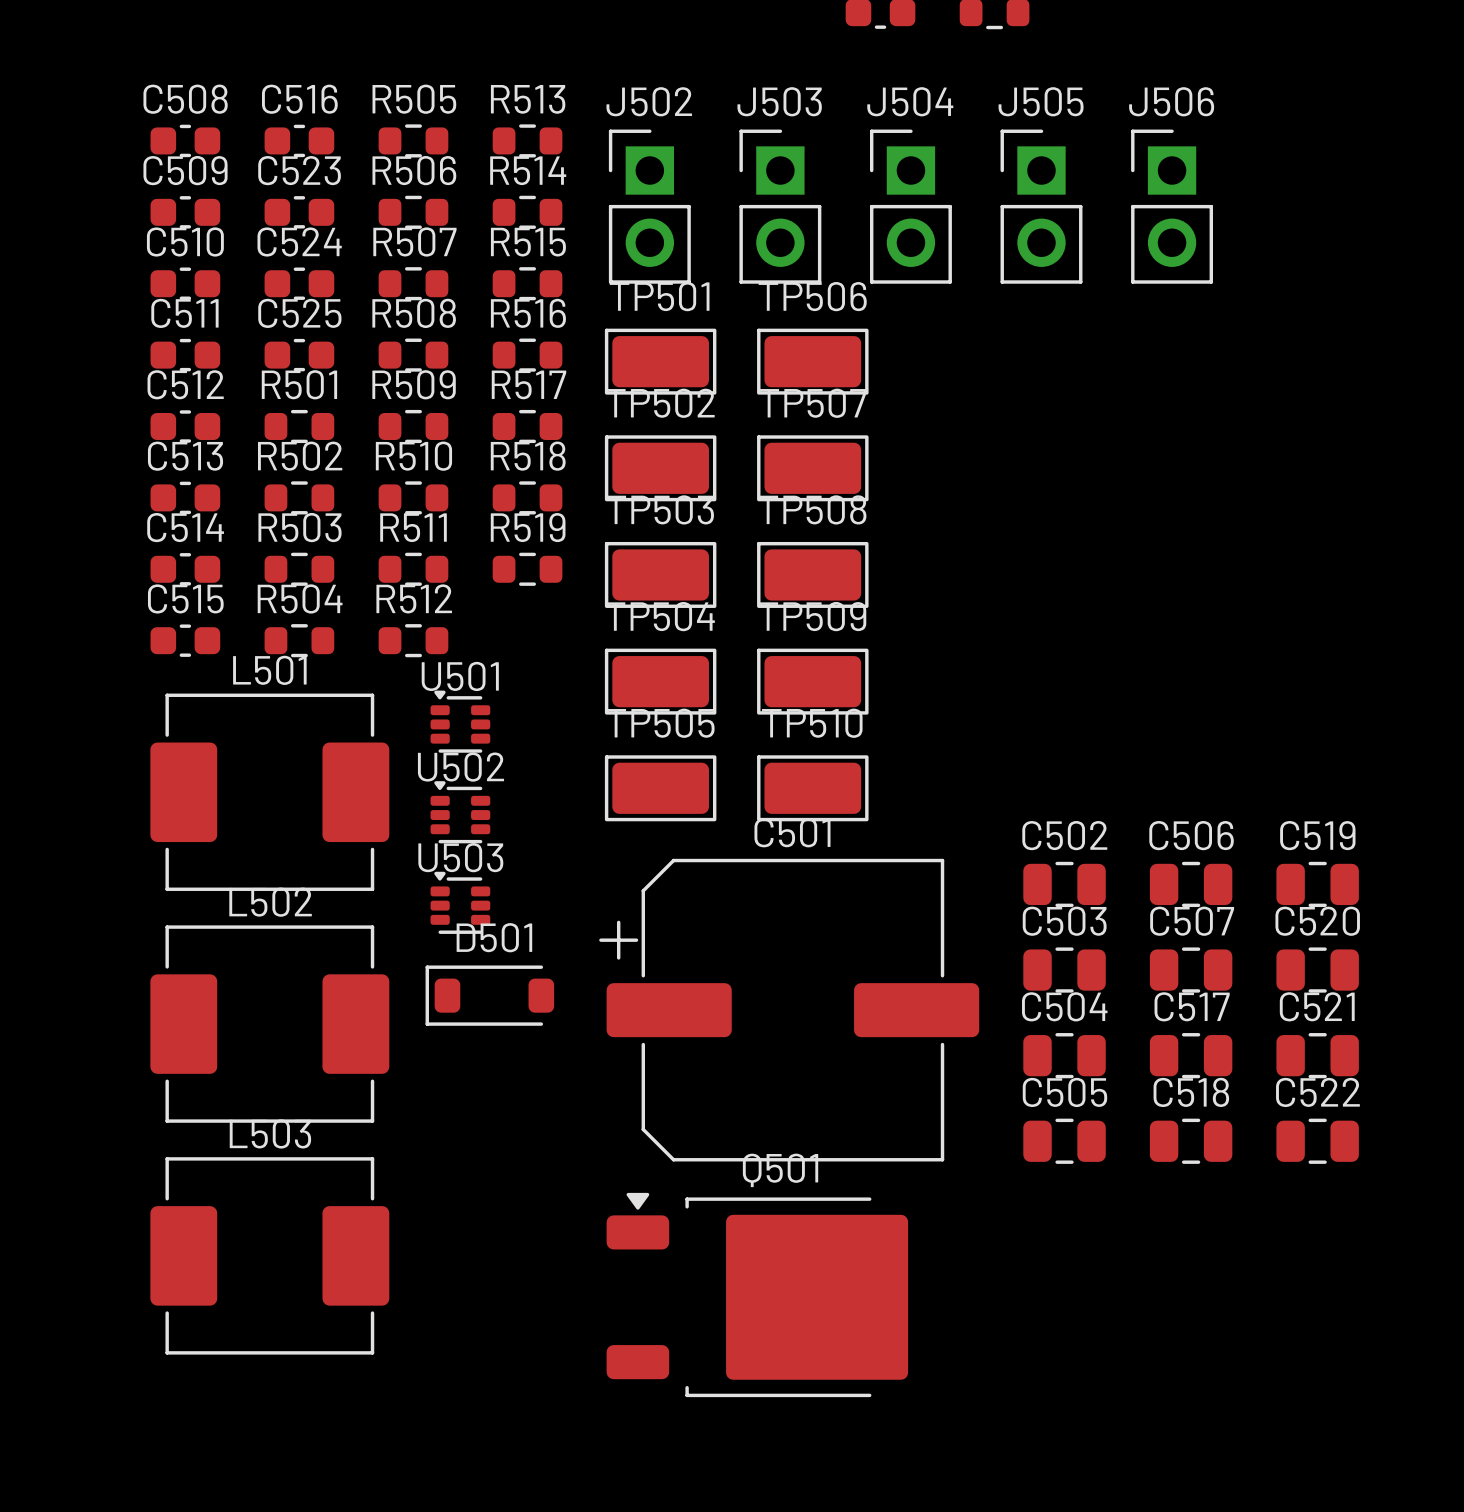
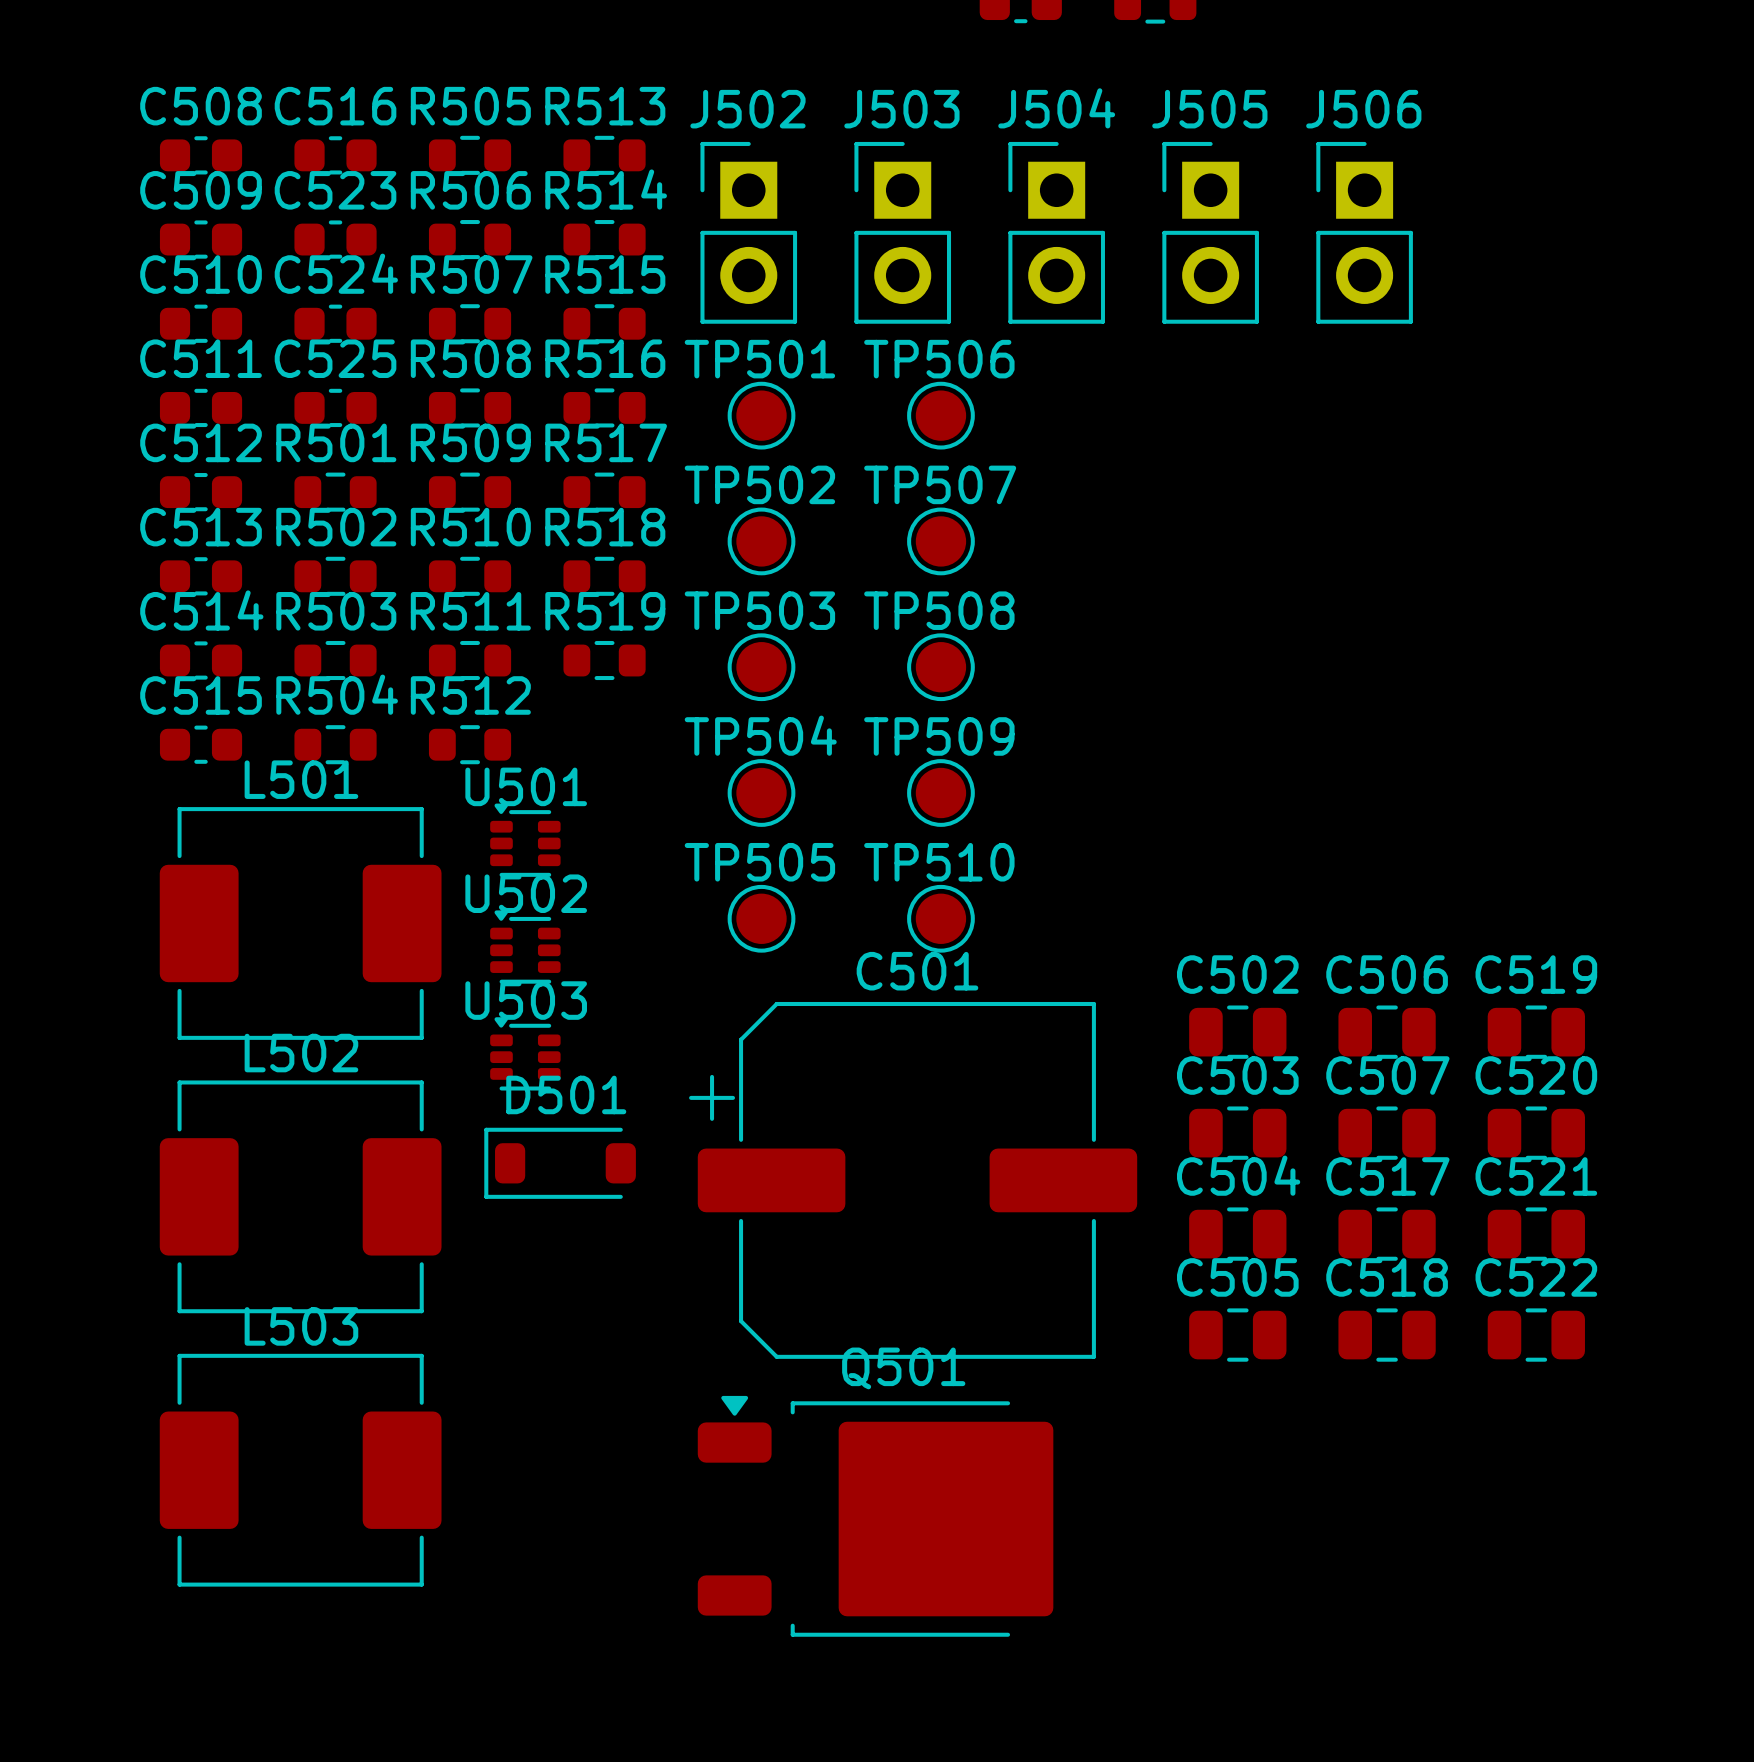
TP501 footprint: [604, 328, 717, 395] -> [727, 381, 796, 450]
TP506 footprint: [757, 328, 869, 395] -> [907, 381, 975, 450]
TP502 footprint: [604, 435, 717, 502] -> [727, 507, 796, 576]
TP507 footprint: [757, 435, 869, 502] -> [907, 507, 975, 576]
TP503 footprint: [604, 541, 717, 608] -> [727, 633, 796, 702]
TP508 footprint: [757, 541, 869, 608] -> [907, 633, 975, 702]
TP504 footprint: [604, 648, 717, 715] -> [727, 759, 796, 827]
TP509 footprint: [757, 648, 869, 715] -> [907, 759, 975, 827]
TP505 footprint: [604, 755, 717, 822] -> [727, 884, 796, 953]
TP510 footprint: [757, 755, 869, 822] -> [907, 884, 975, 953]

